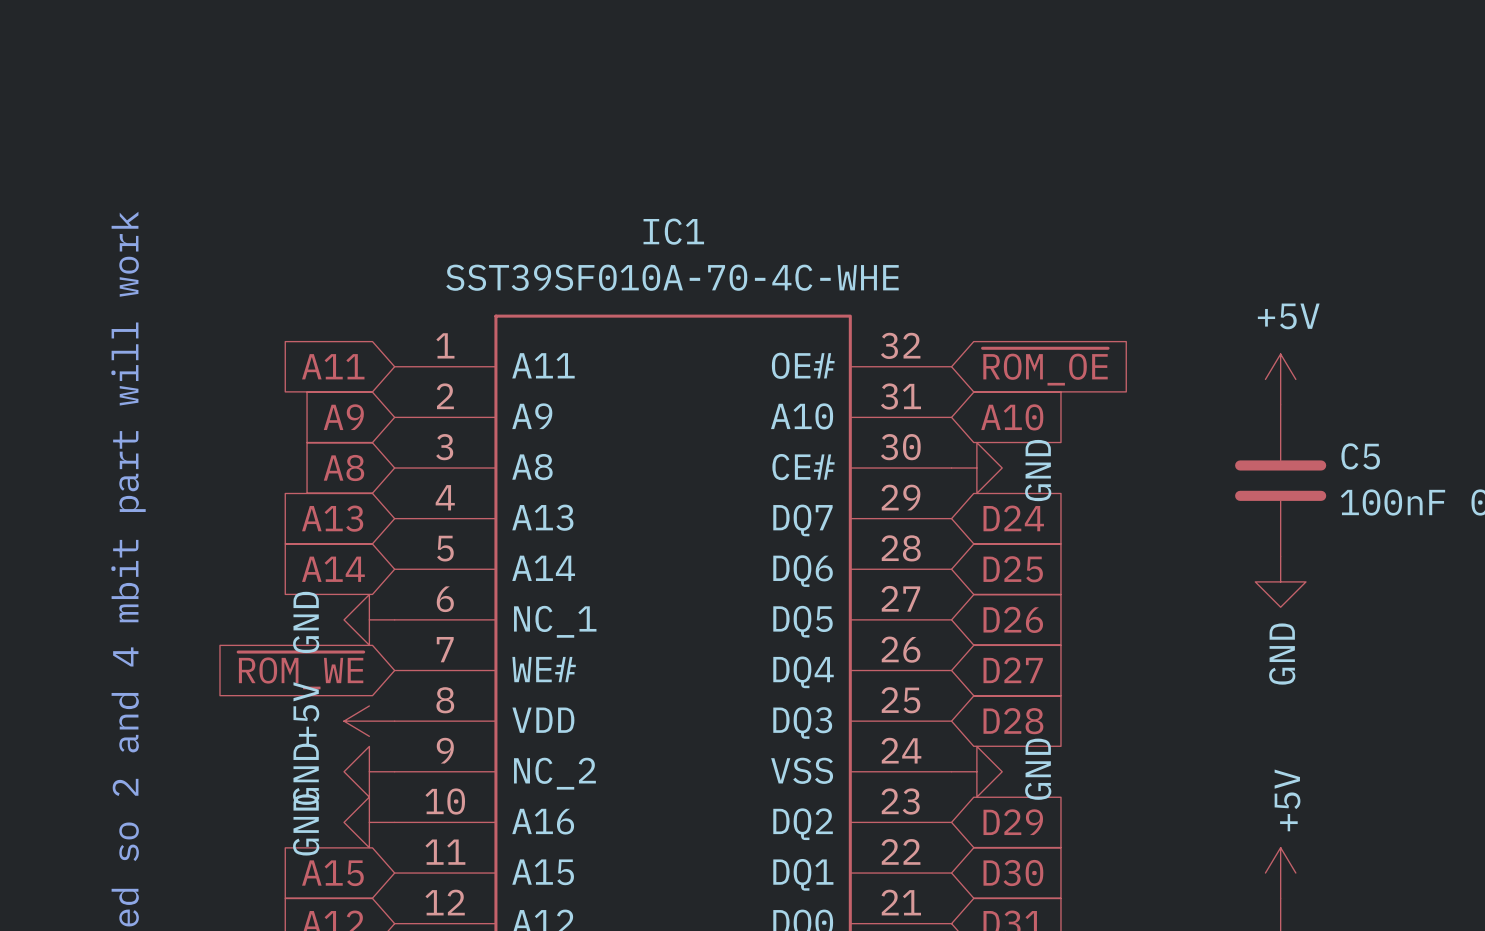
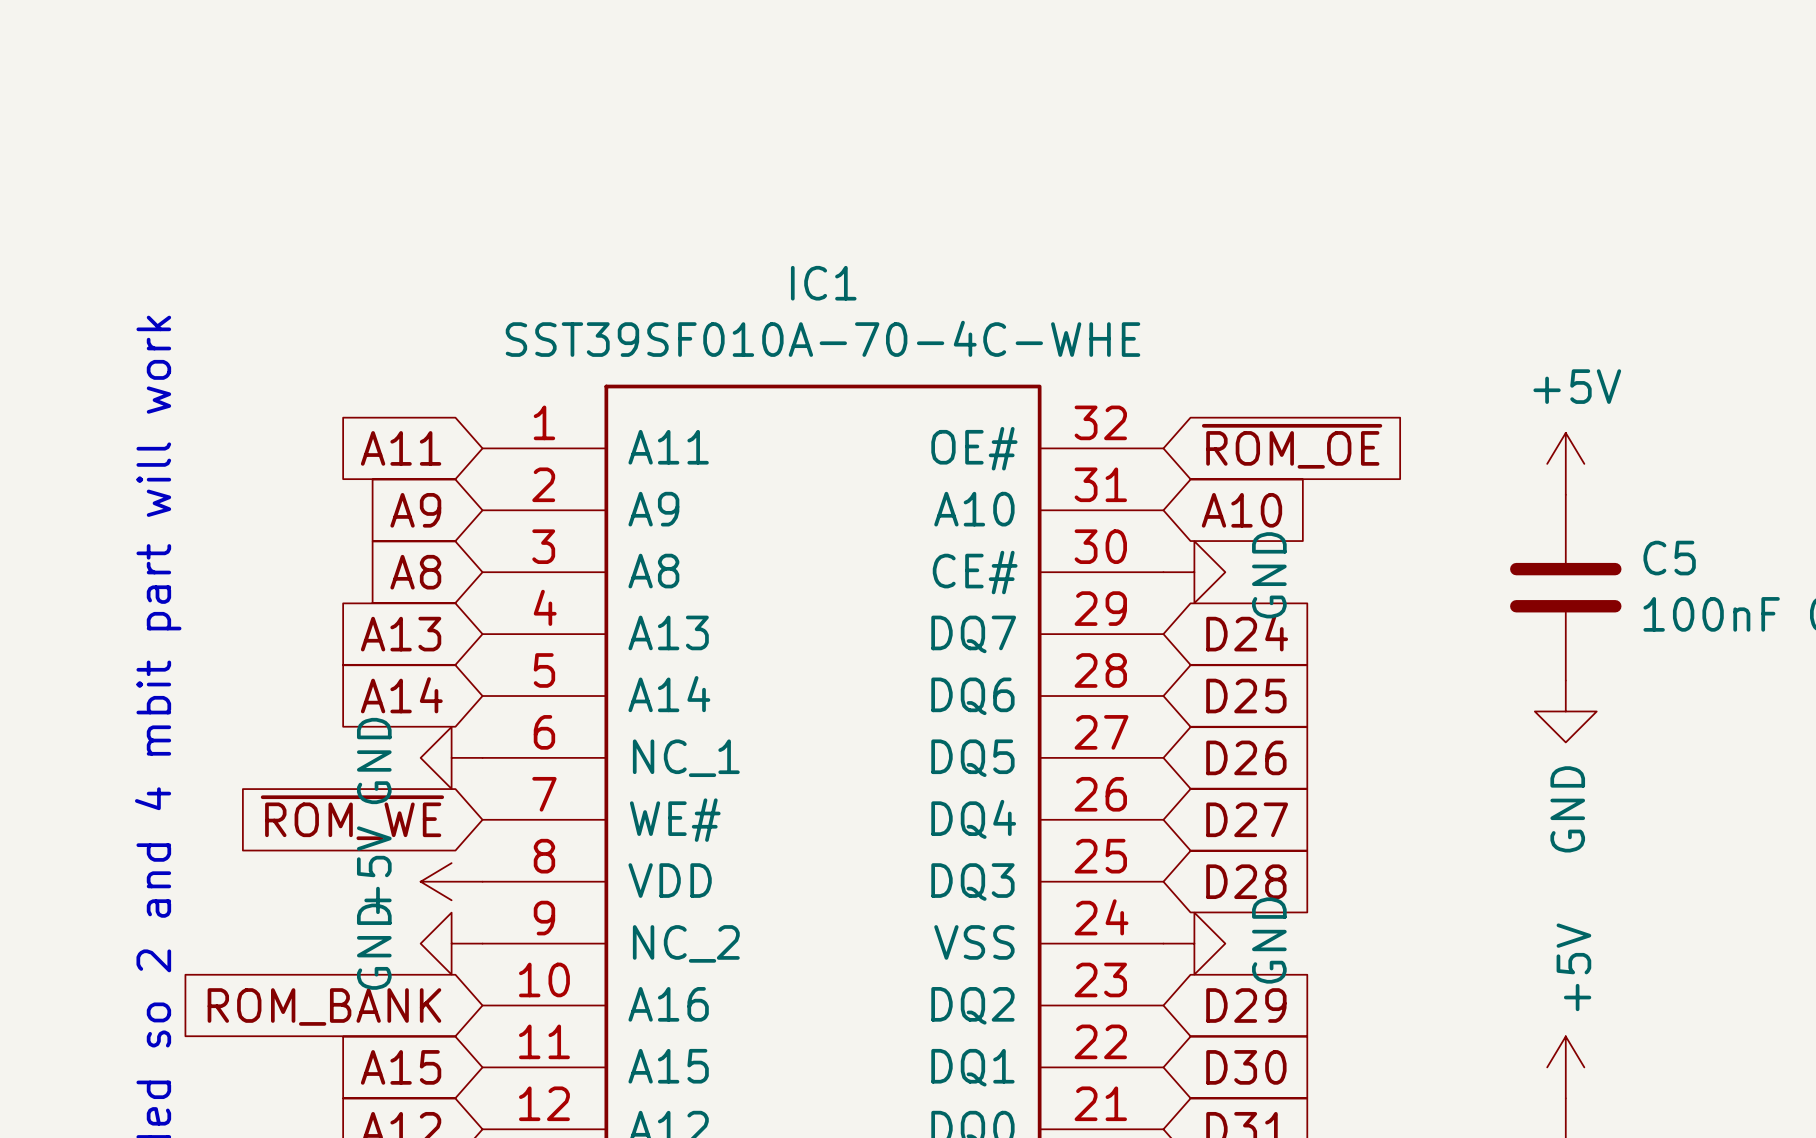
power symbol: GND (369, 822) -> none
global label: none -> ROM_BANK (324, 1006)

